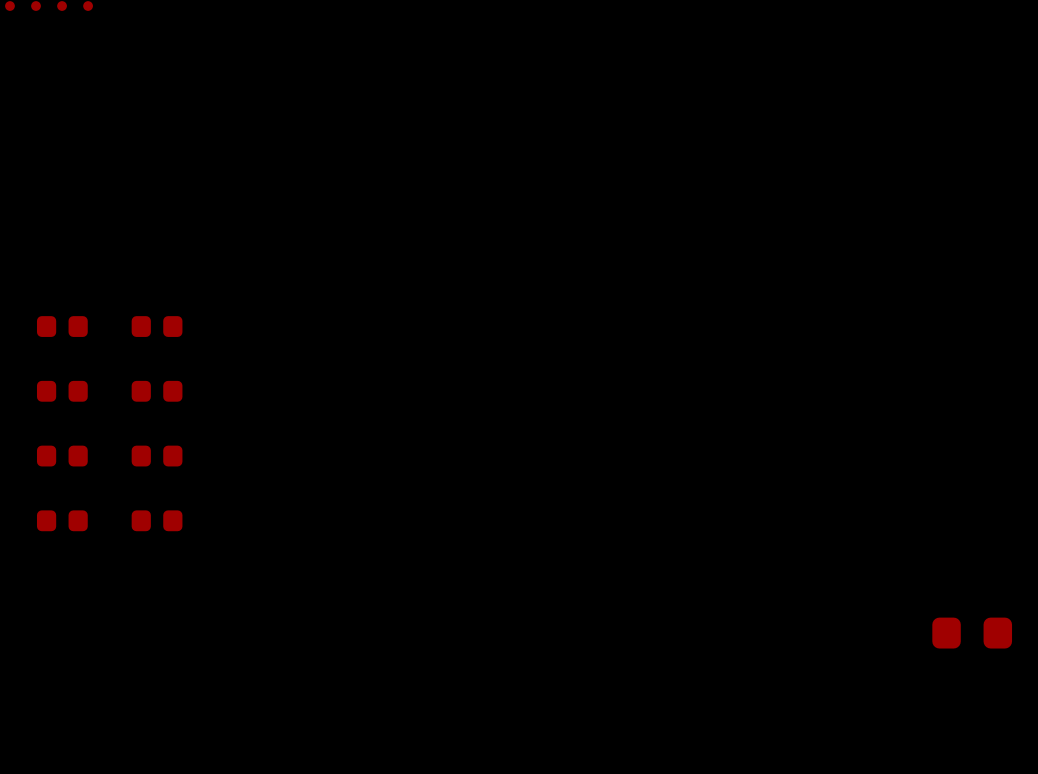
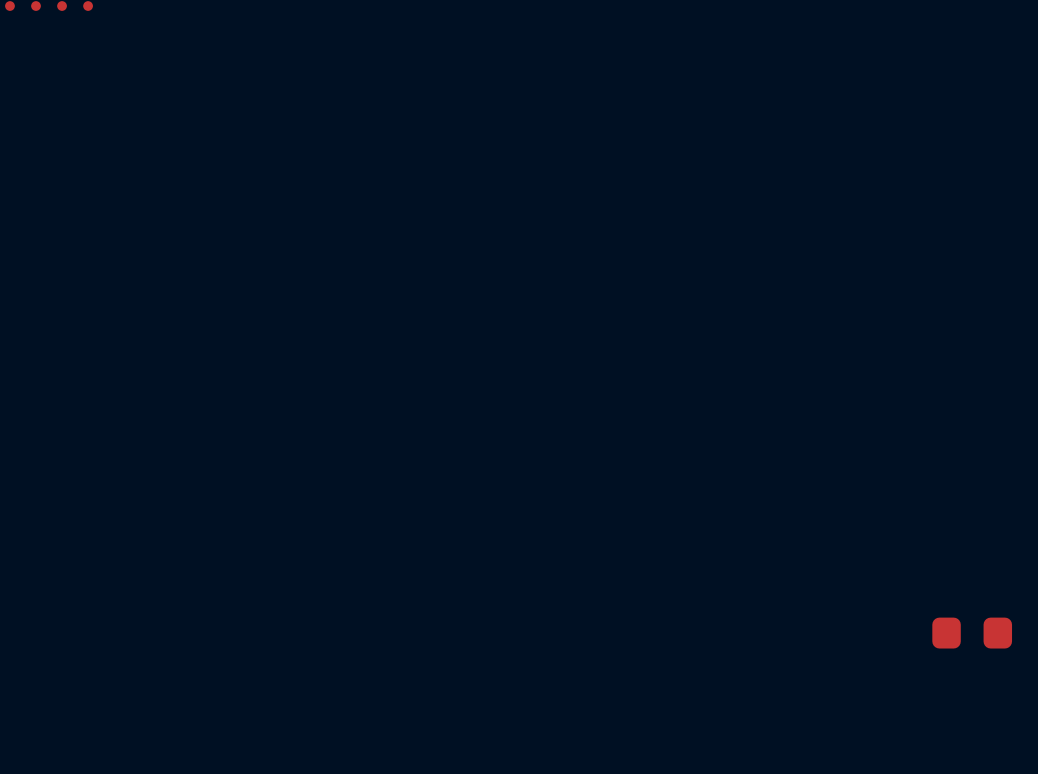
part: (62, 326) -> none
part: (157, 326) -> none
part: (62, 391) -> none
part: (157, 391) -> none
part: (62, 456) -> none
part: (157, 456) -> none
part: (62, 520) -> none
part: (157, 520) -> none

